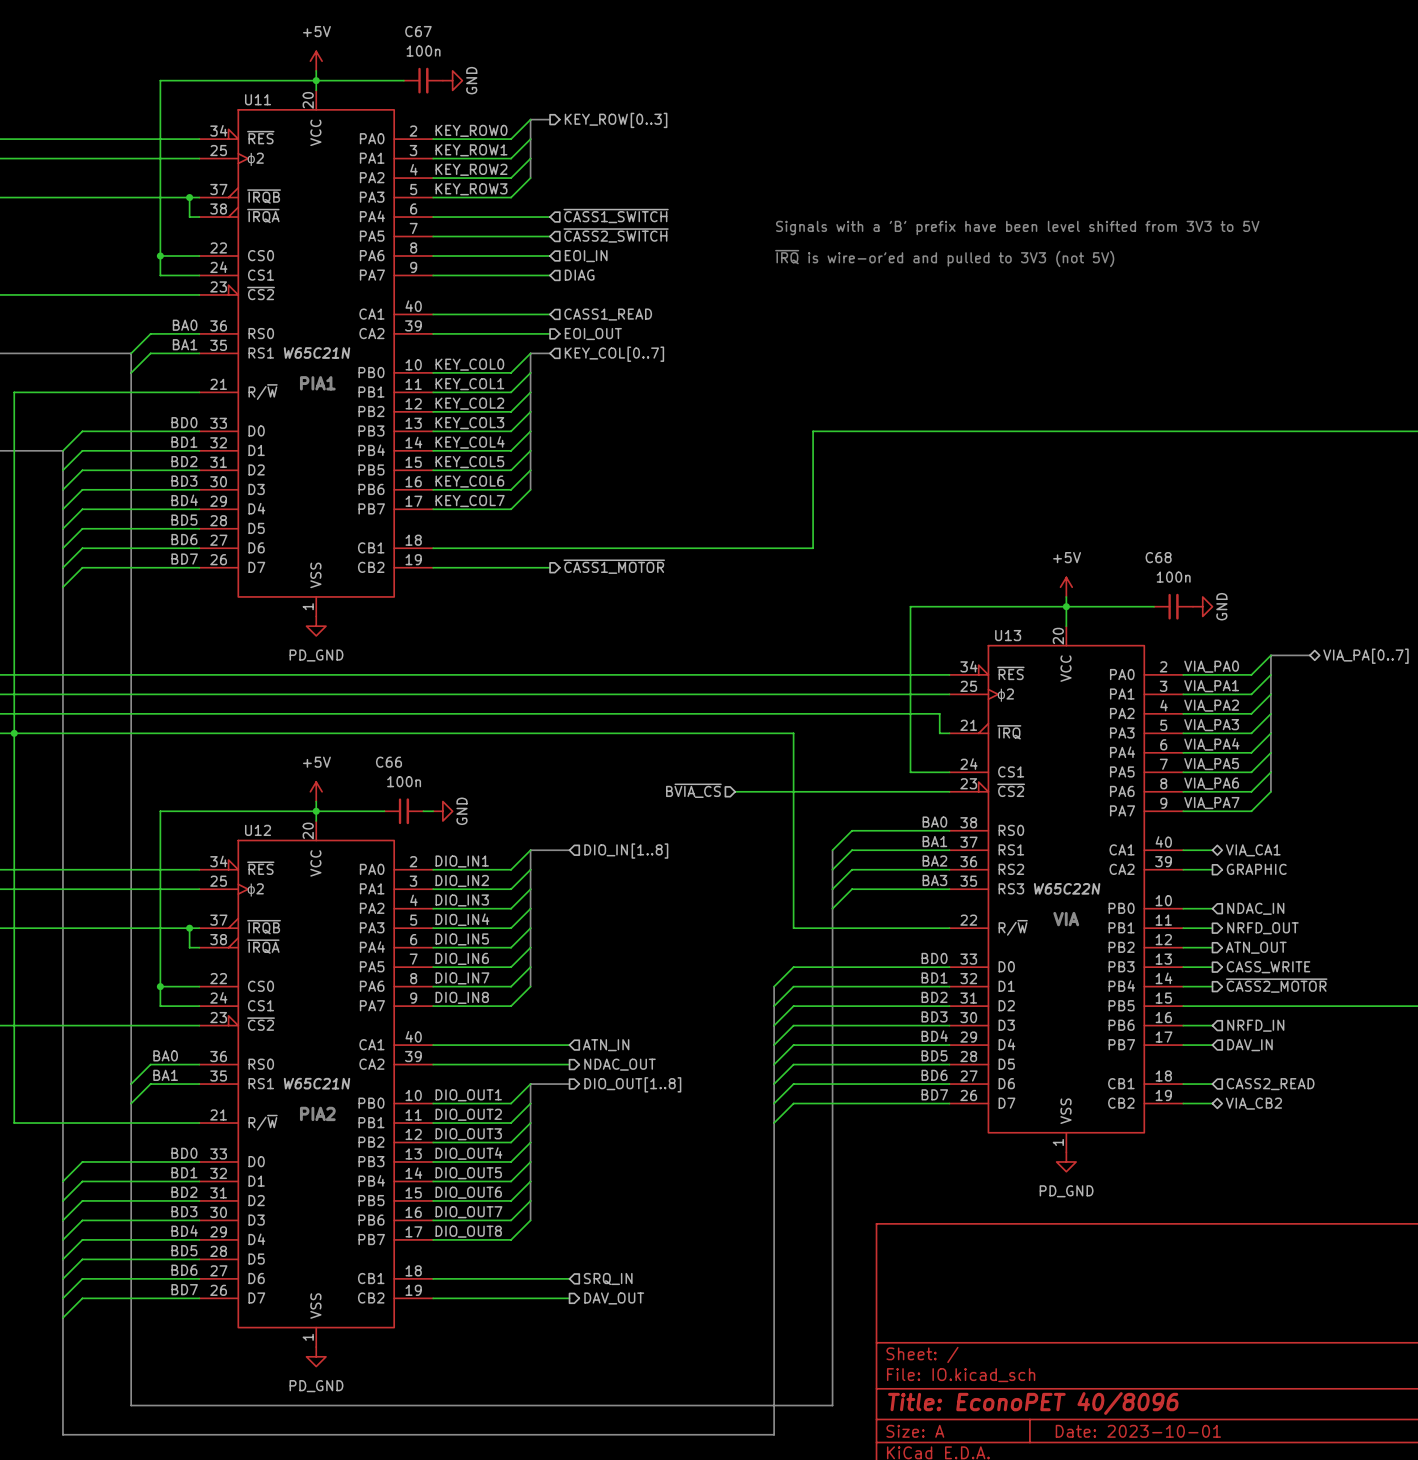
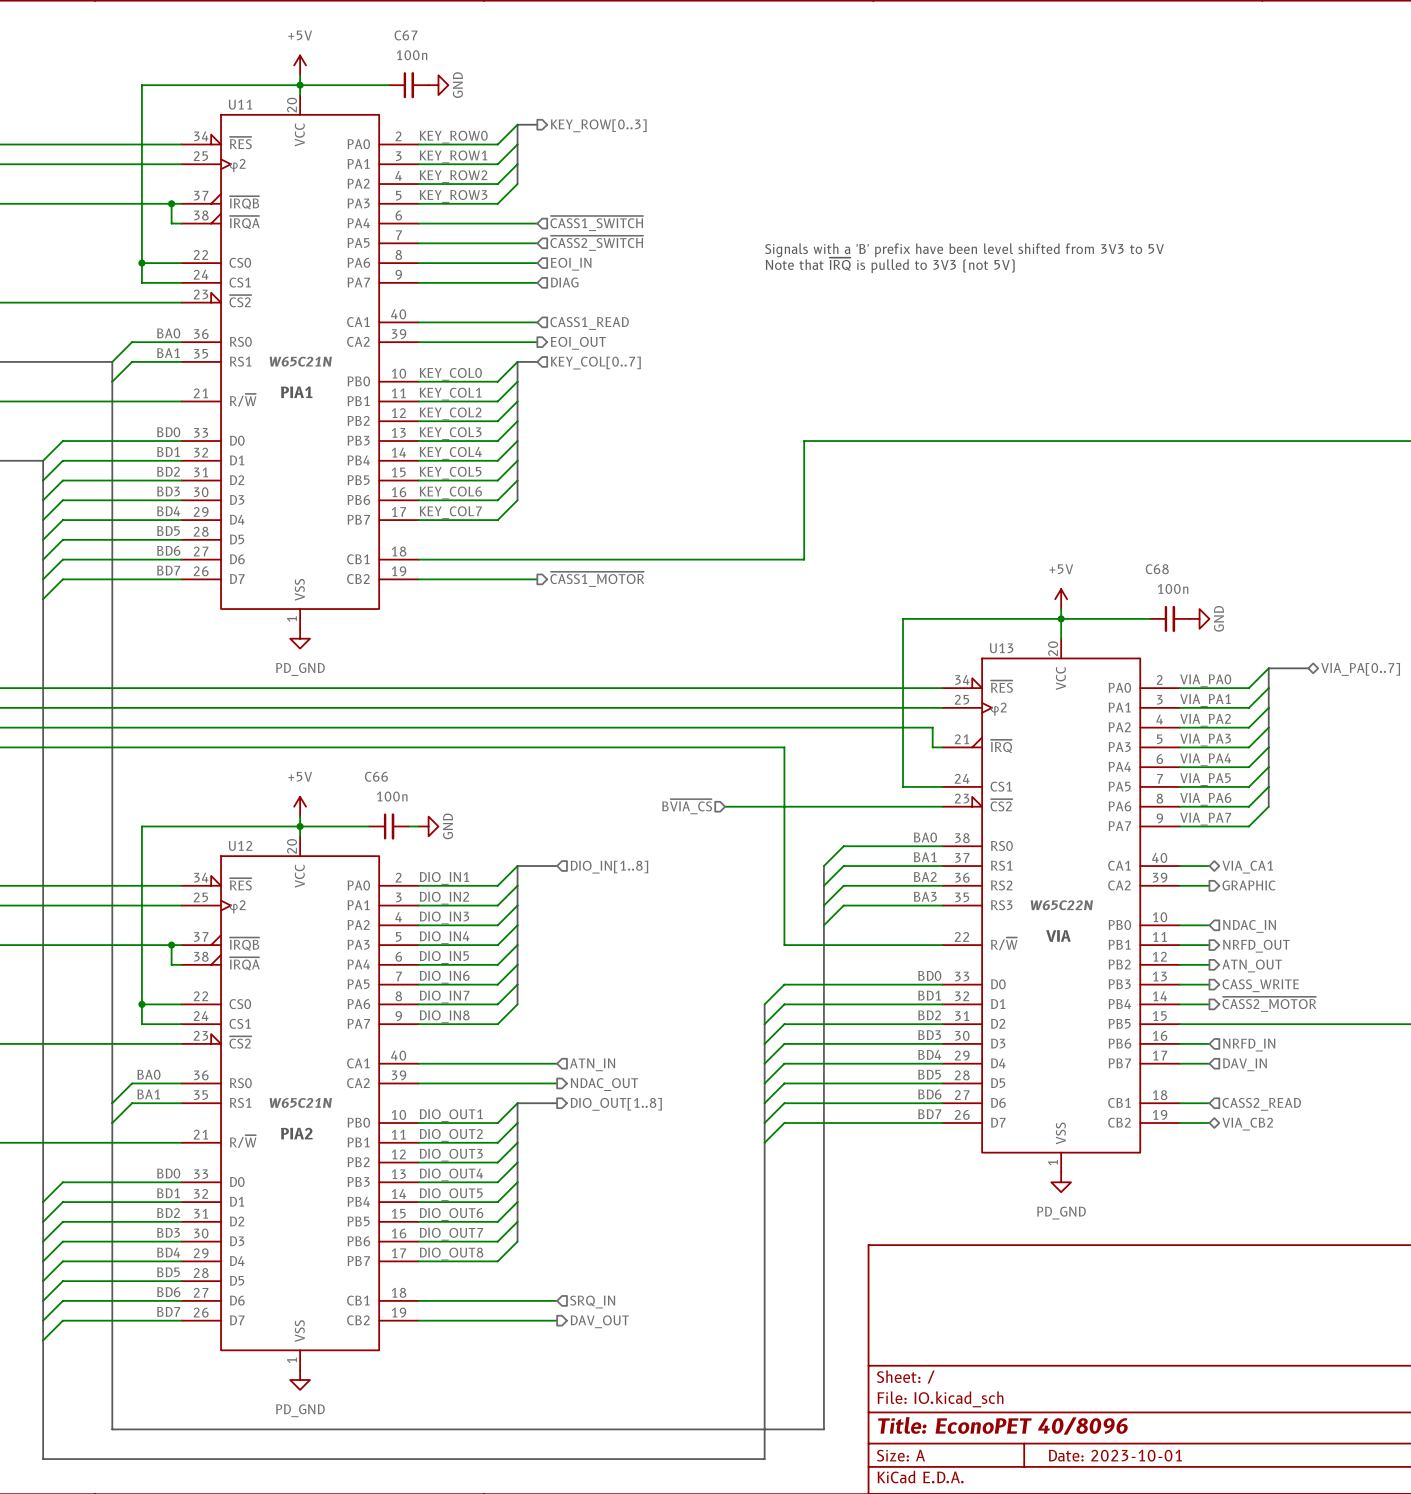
text position: Signals with a 'B' prefix have been level shifted from 3V3 to 5V (1017, 228) -> Signals with a 'B' prefix have been level shifted from 3V3 to 5V (964, 250)
text: ~{IRQ} is wire-or'ed and pulled to 3V3 (not 5V) (944, 258) -> Note that ~{IRQ} is pulled to 3V3 (not 5V) (890, 265)

